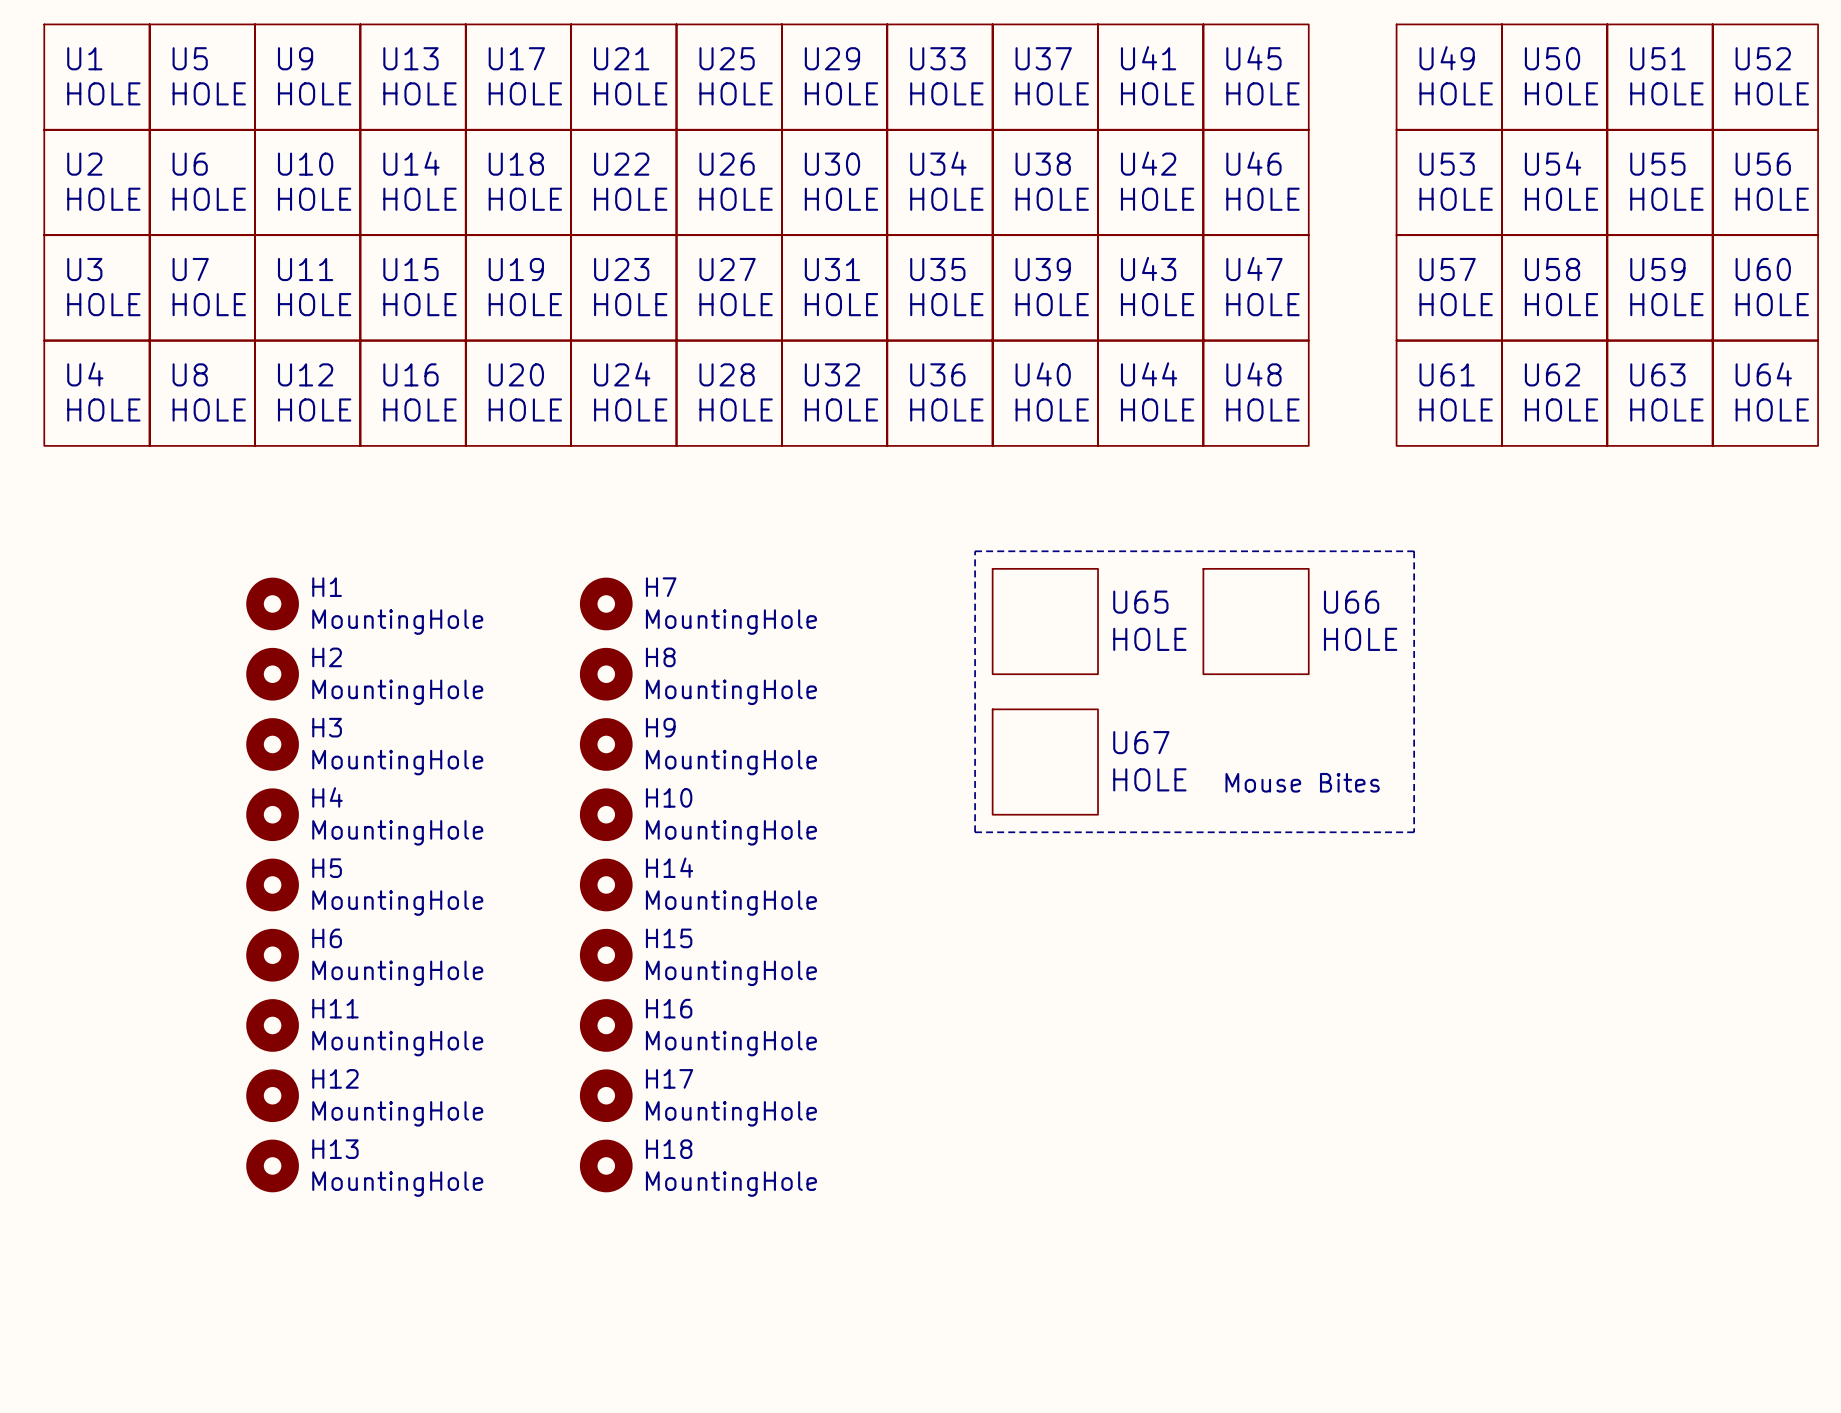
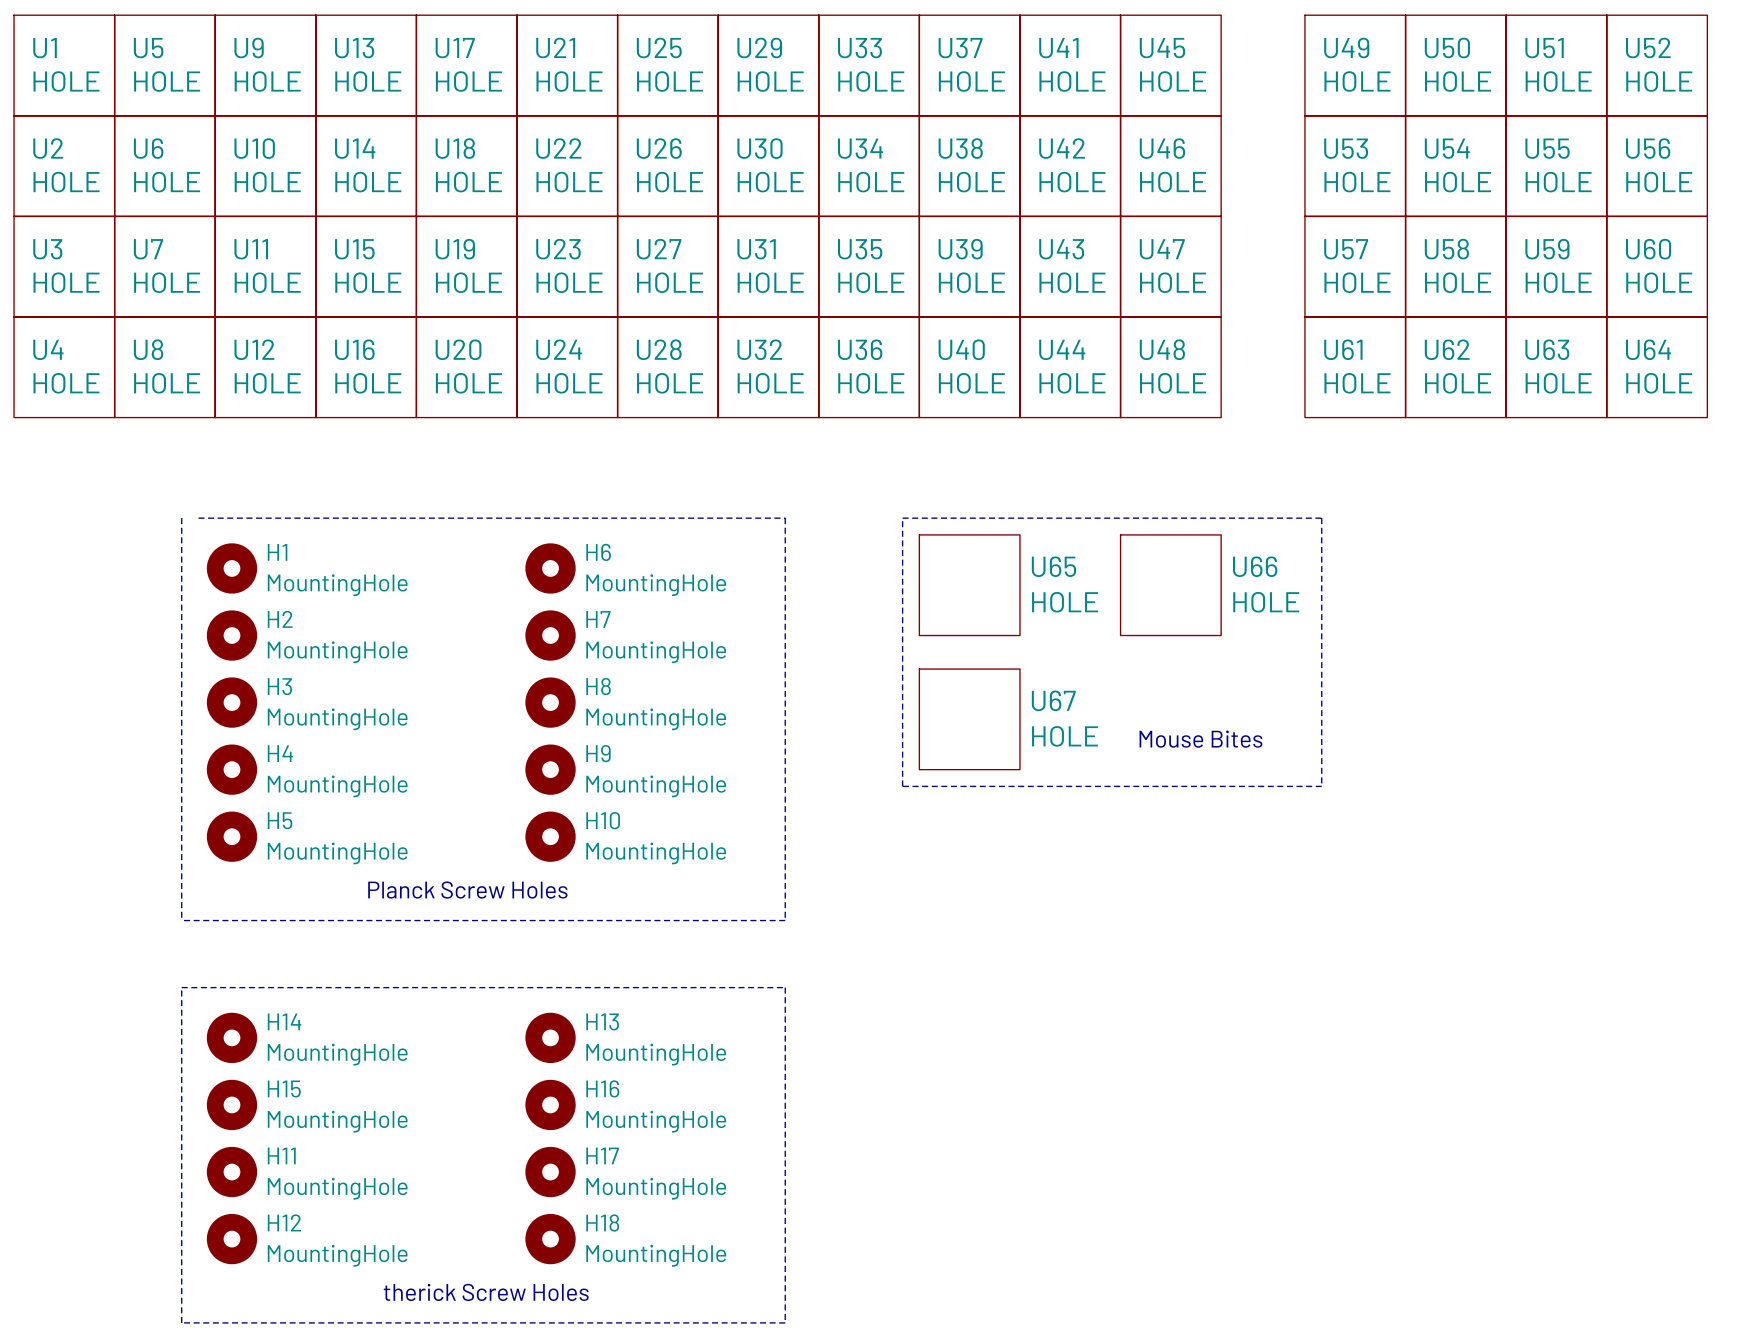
line: none -> (181, 518) (181, 920) (785, 920) (785, 518) (198, 518)
H7 name: H7 (661, 587) -> H6 (598, 552)
H8 name: H8 (660, 657) -> H7 (598, 619)
H9 name: H9 (660, 727) -> H8 (598, 686)
H10 name: H10 (669, 797) -> H9 (598, 753)
H14 name: H14 (669, 867) -> H10 (603, 820)
text: none -> Planck Screw Holes (467, 890)
H6: MountingHole (272, 955) -> none
H15: MountingHole (606, 955) -> none
H11 position: (272, 1025) -> (231, 1172)
H16: MountingHole (606, 1025) -> none
line: none -> (181, 987) (181, 1322) (785, 1322) (785, 987) (181, 987)
H12 name: H12 (335, 1078) -> H14 (284, 1021)
H17 name: H17 (669, 1078) -> H13 (602, 1021)
H13 name: H13 (335, 1149) -> H15 (284, 1088)
H18 name: H18 (669, 1149) -> H16 (602, 1088)
H17: none -> MountingHole (550, 1172)
H12: none -> MountingHole (231, 1239)
H18: none -> MountingHole (550, 1239)
text: none -> therick Screw Holes (486, 1292)

